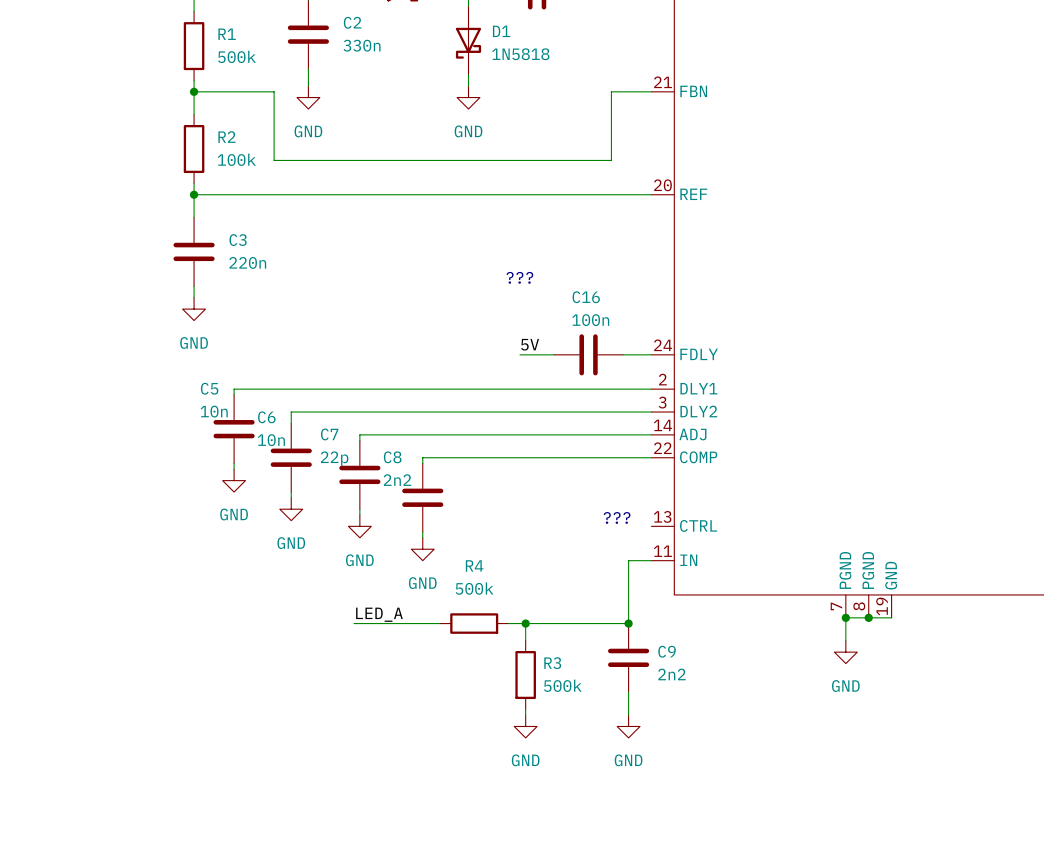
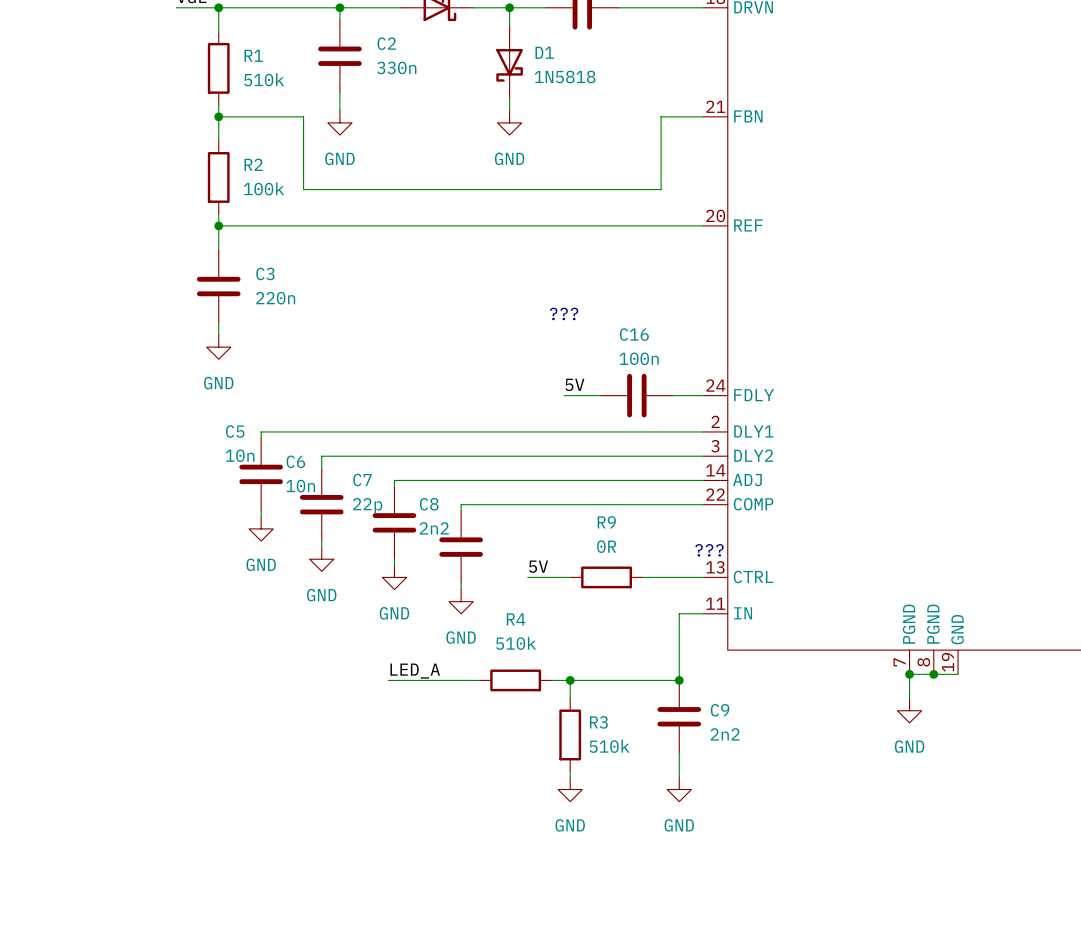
R1 value: 500k (236, 56) -> 510k (264, 79)
label: none -> 5V (538, 566)
text position: ??? (617, 517) -> ??? (709, 550)
wire: none -> (527, 577) (570, 577)
R9: none -> 0R (606, 577)
wire: none -> (642, 577) (703, 577)
R4 value: 500k (474, 588) -> 510k (516, 643)
R3 value: 500k (562, 685) -> 510k (609, 746)

